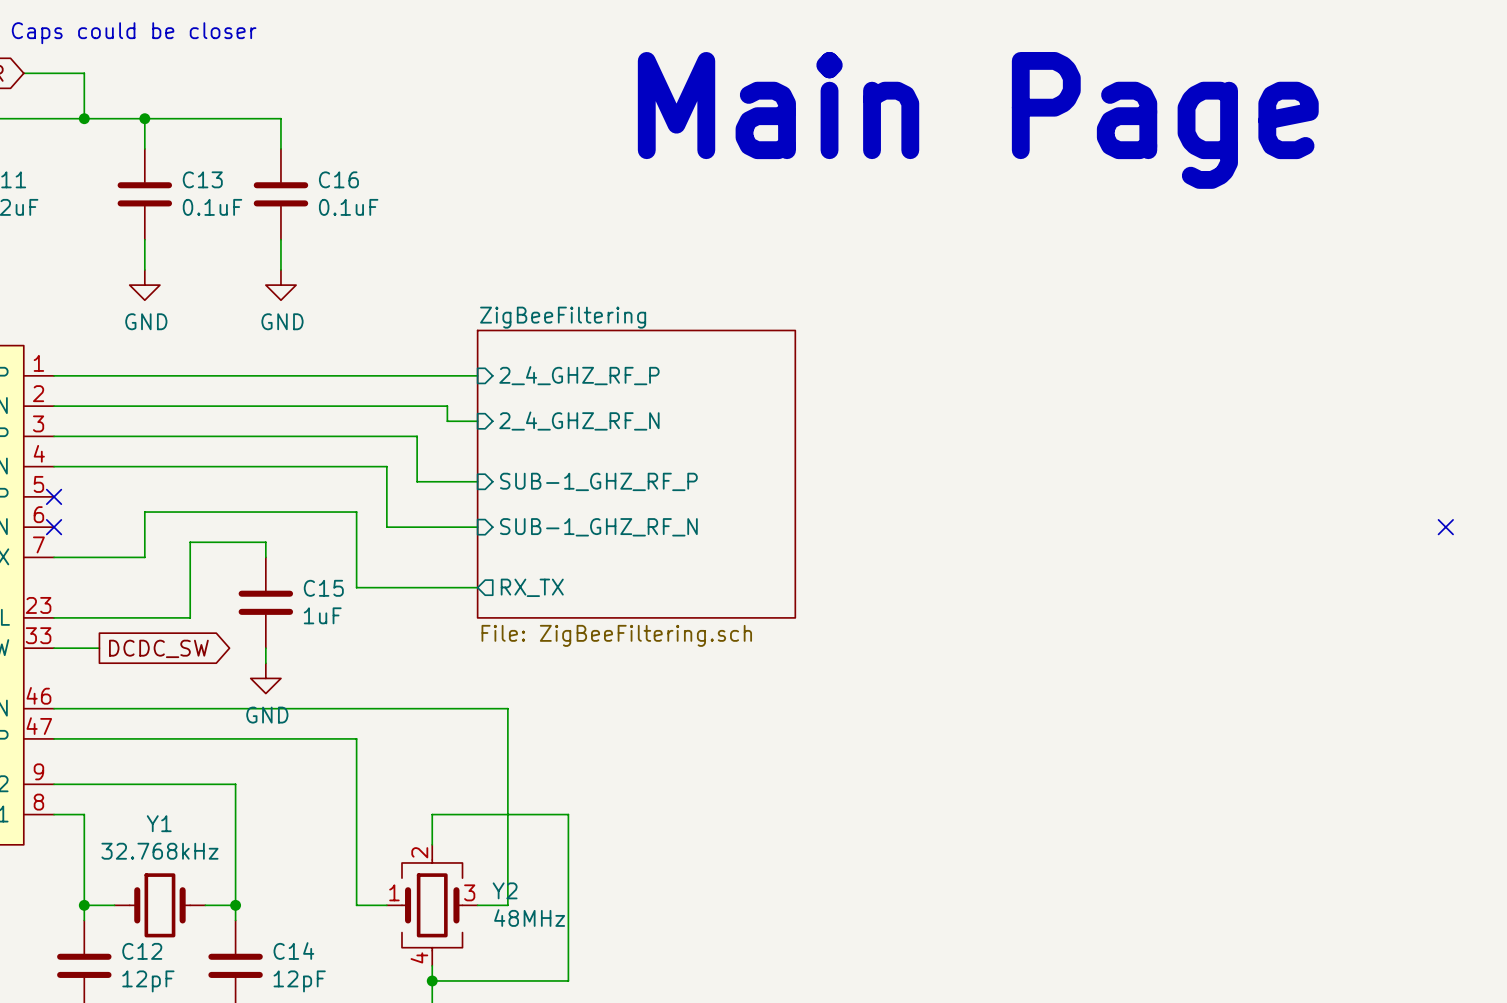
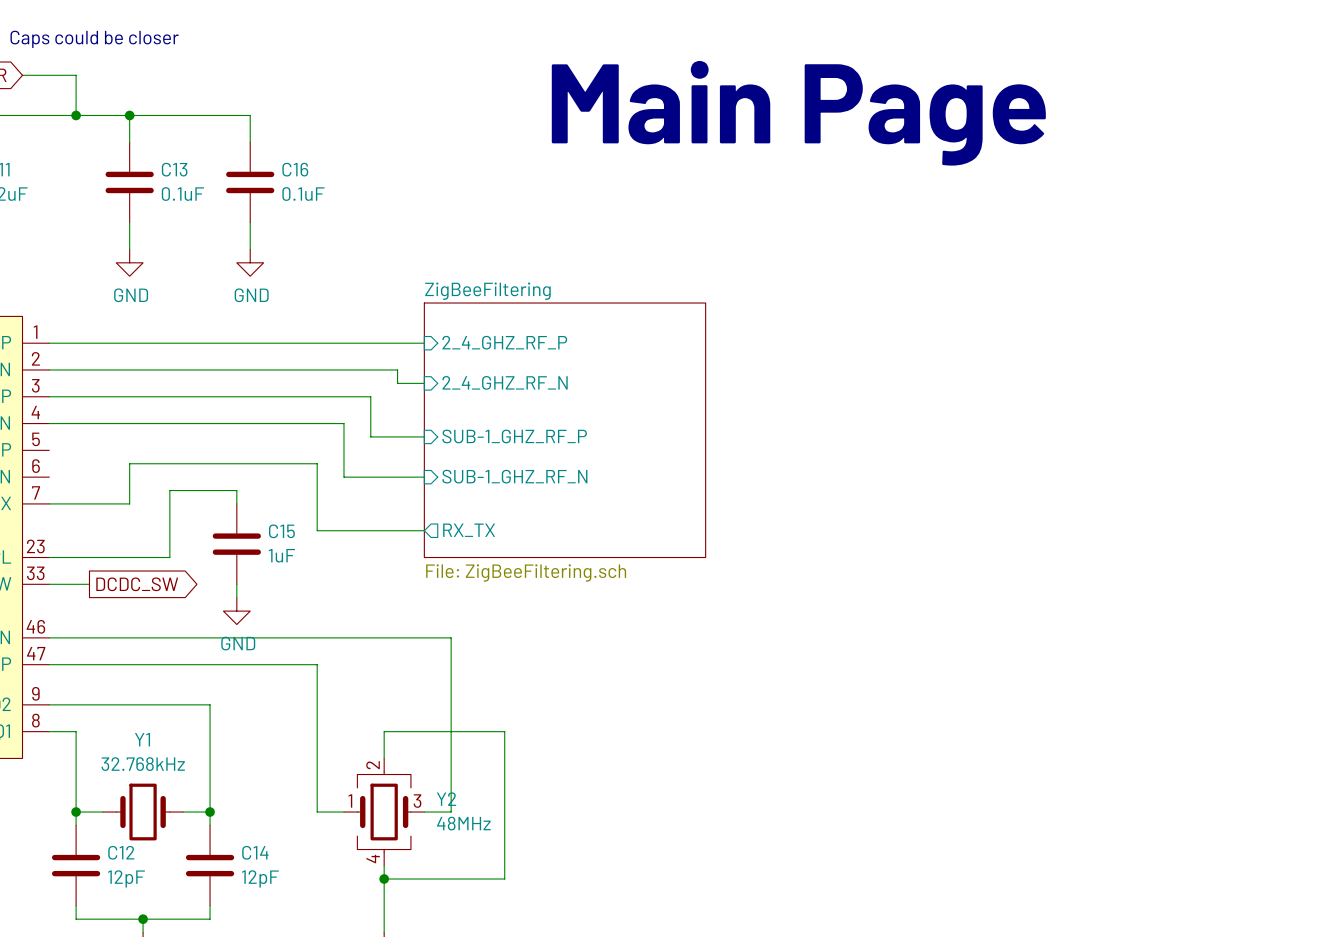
no-connect mark: (54, 496) -> none
no-connect mark: (54, 527) -> none
no-connect mark: (1445, 527) -> none

